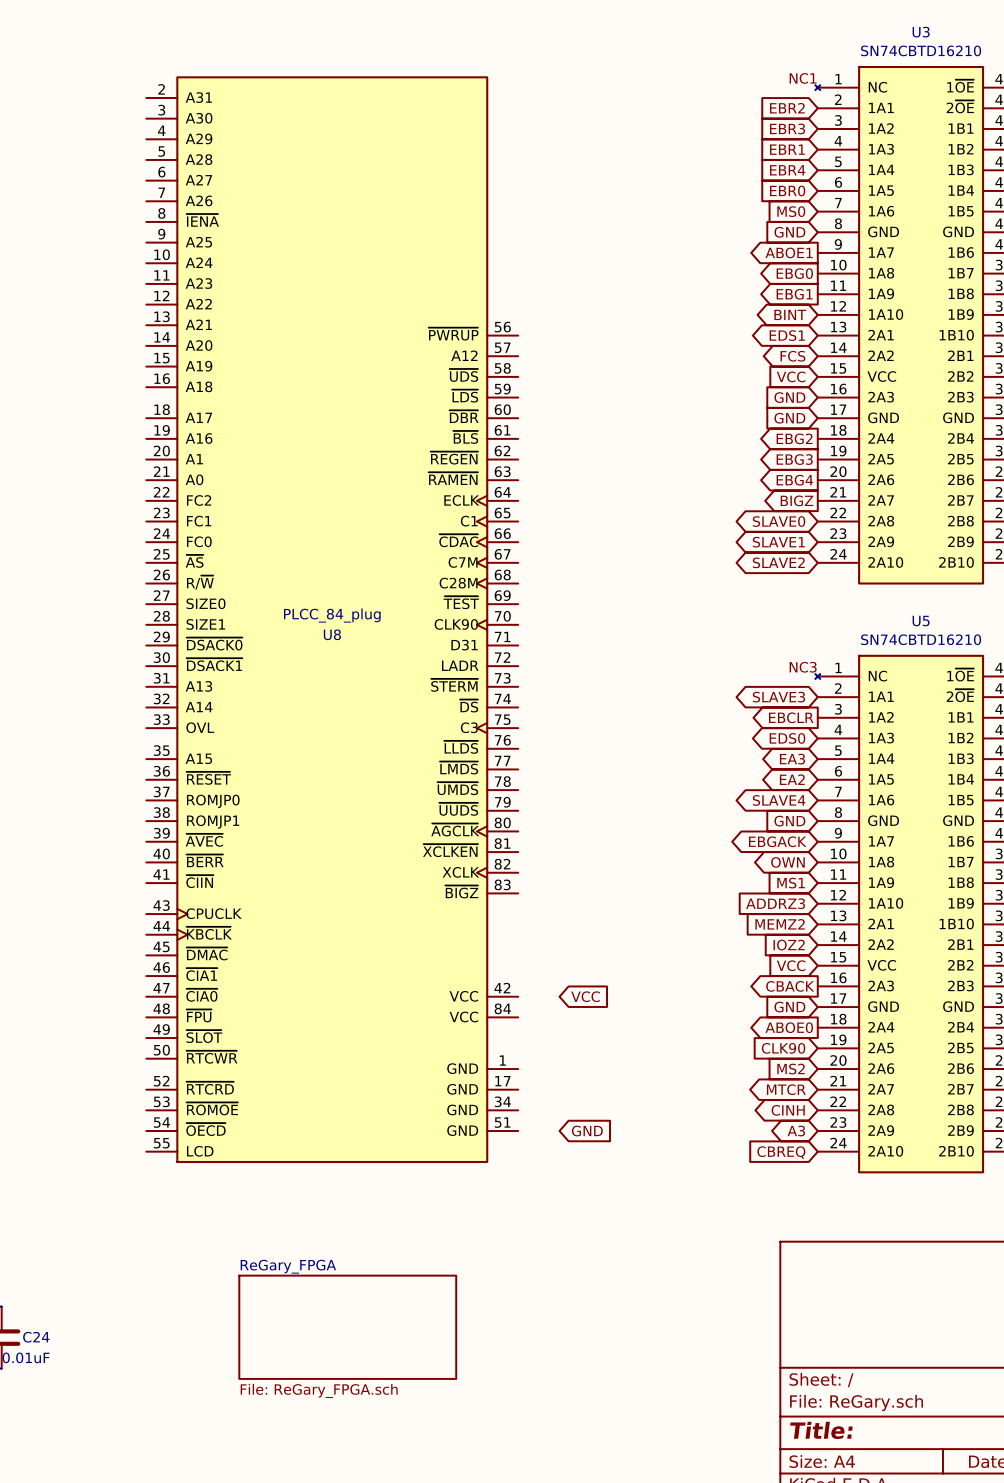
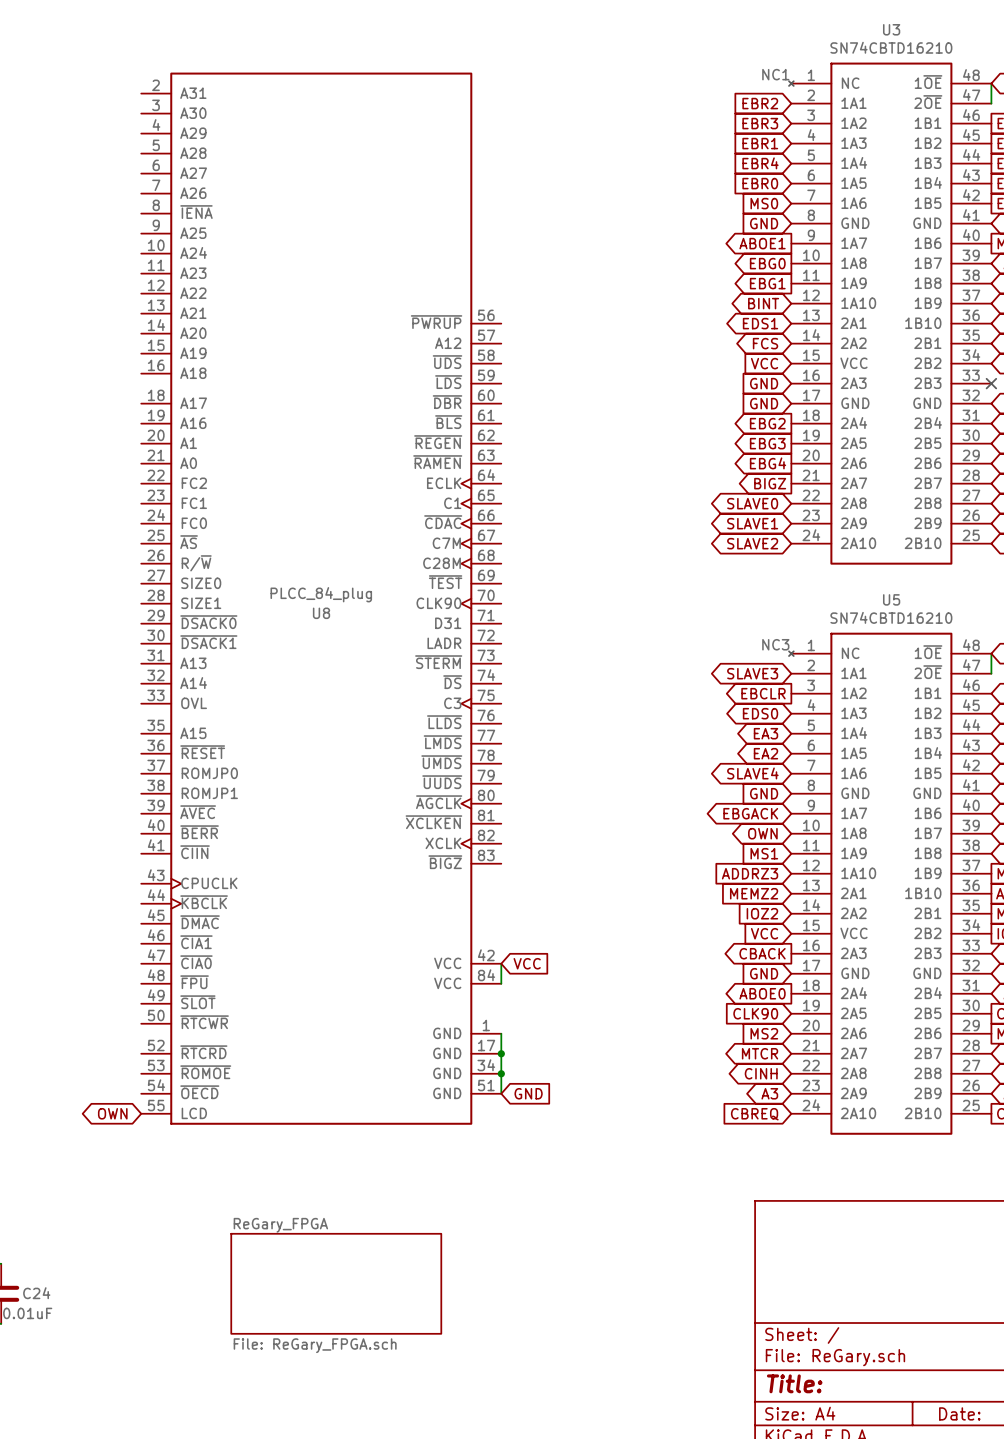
wire: none -> (501, 963) (501, 983)
global label position: VCC (585, 996) -> VCC (527, 963)
wire: none -> (501, 1033) (501, 1093)
junction: none -> (501, 1053)
junction: none -> (501, 1073)
global label position: GND (587, 1131) -> GND (528, 1093)
global label: none -> OWN (112, 1113)

